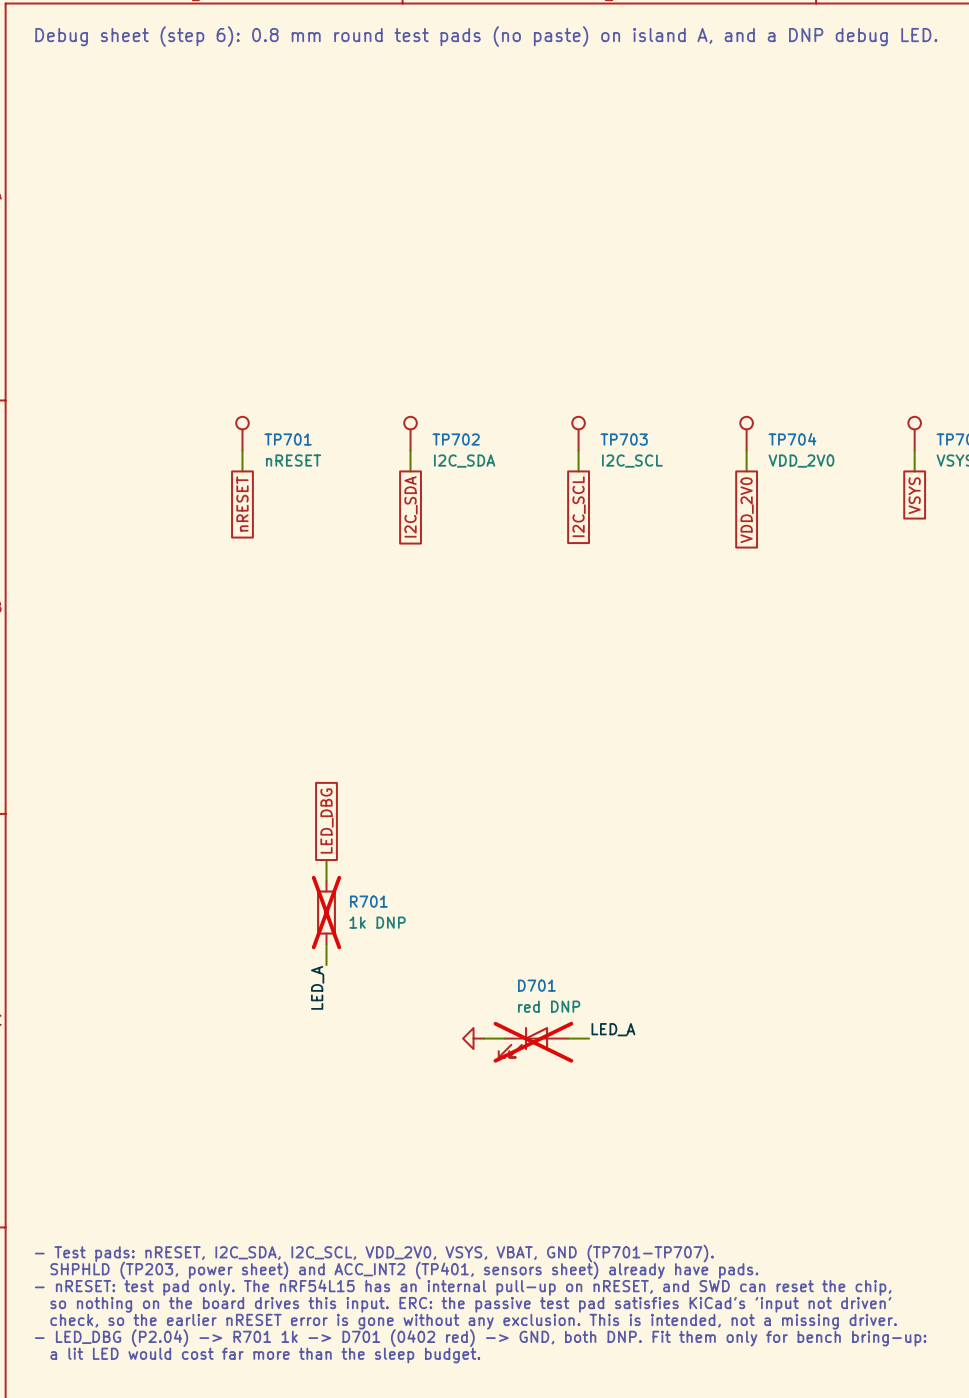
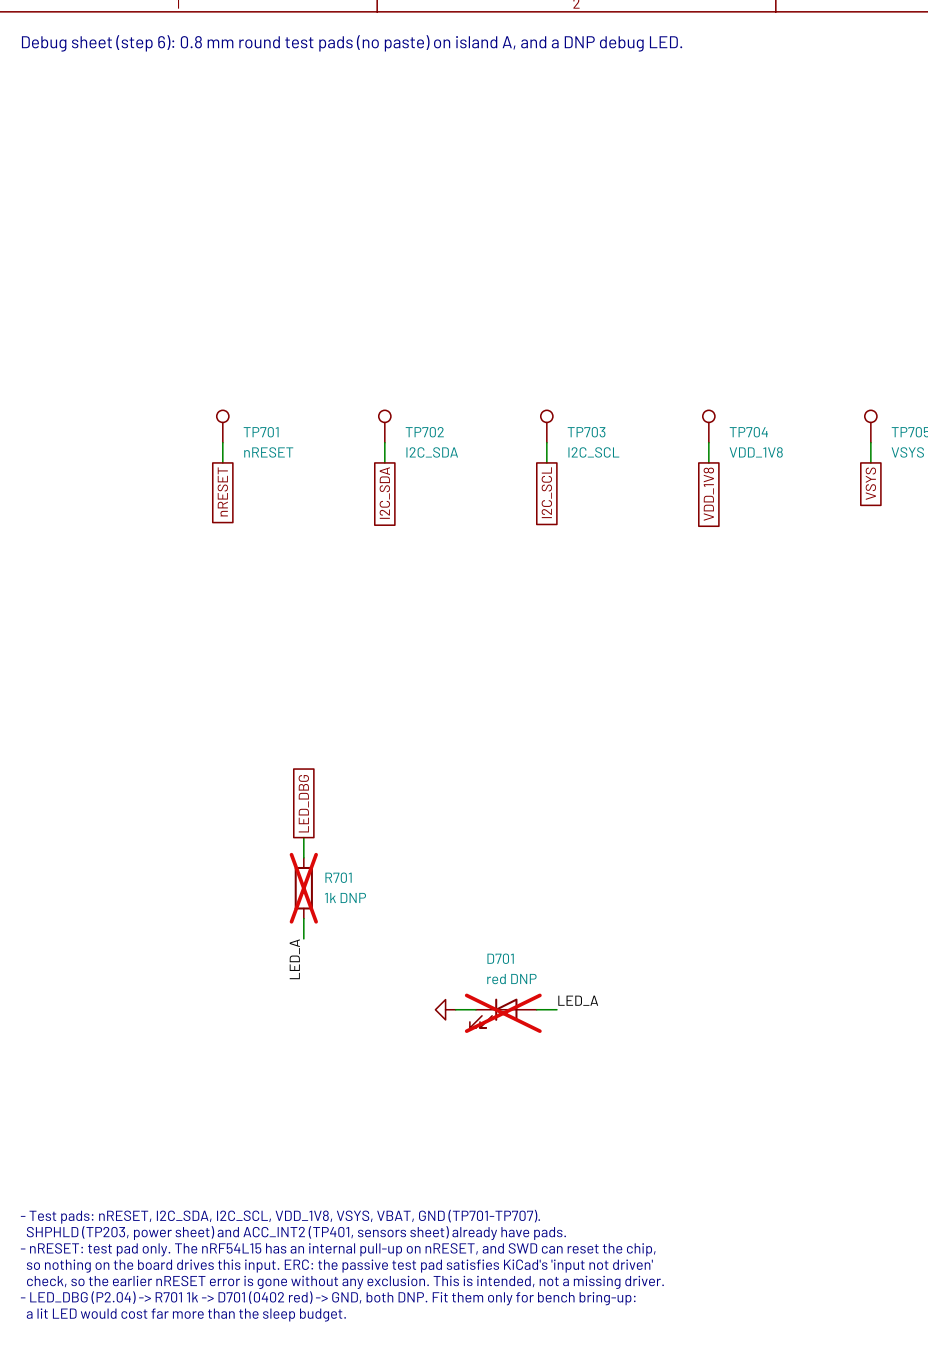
TP704 value: VDD_2V0 (801, 461) -> VDD_1V8 (756, 452)
global label: VDD_2V0 (747, 510) -> VDD_1V8 (708, 494)
text: - Test pads: nRESET, I2C_SDA, I2C_SCL, VDD_2V0, VSYS, VBAT, GND (TP701-TP707). (374, 1253) -> - Test pads: nRESET, I2C_SDA, I2C_SCL, VDD_1V8, VSYS, VBAT, GND (TP701-TP707). (280, 1216)

